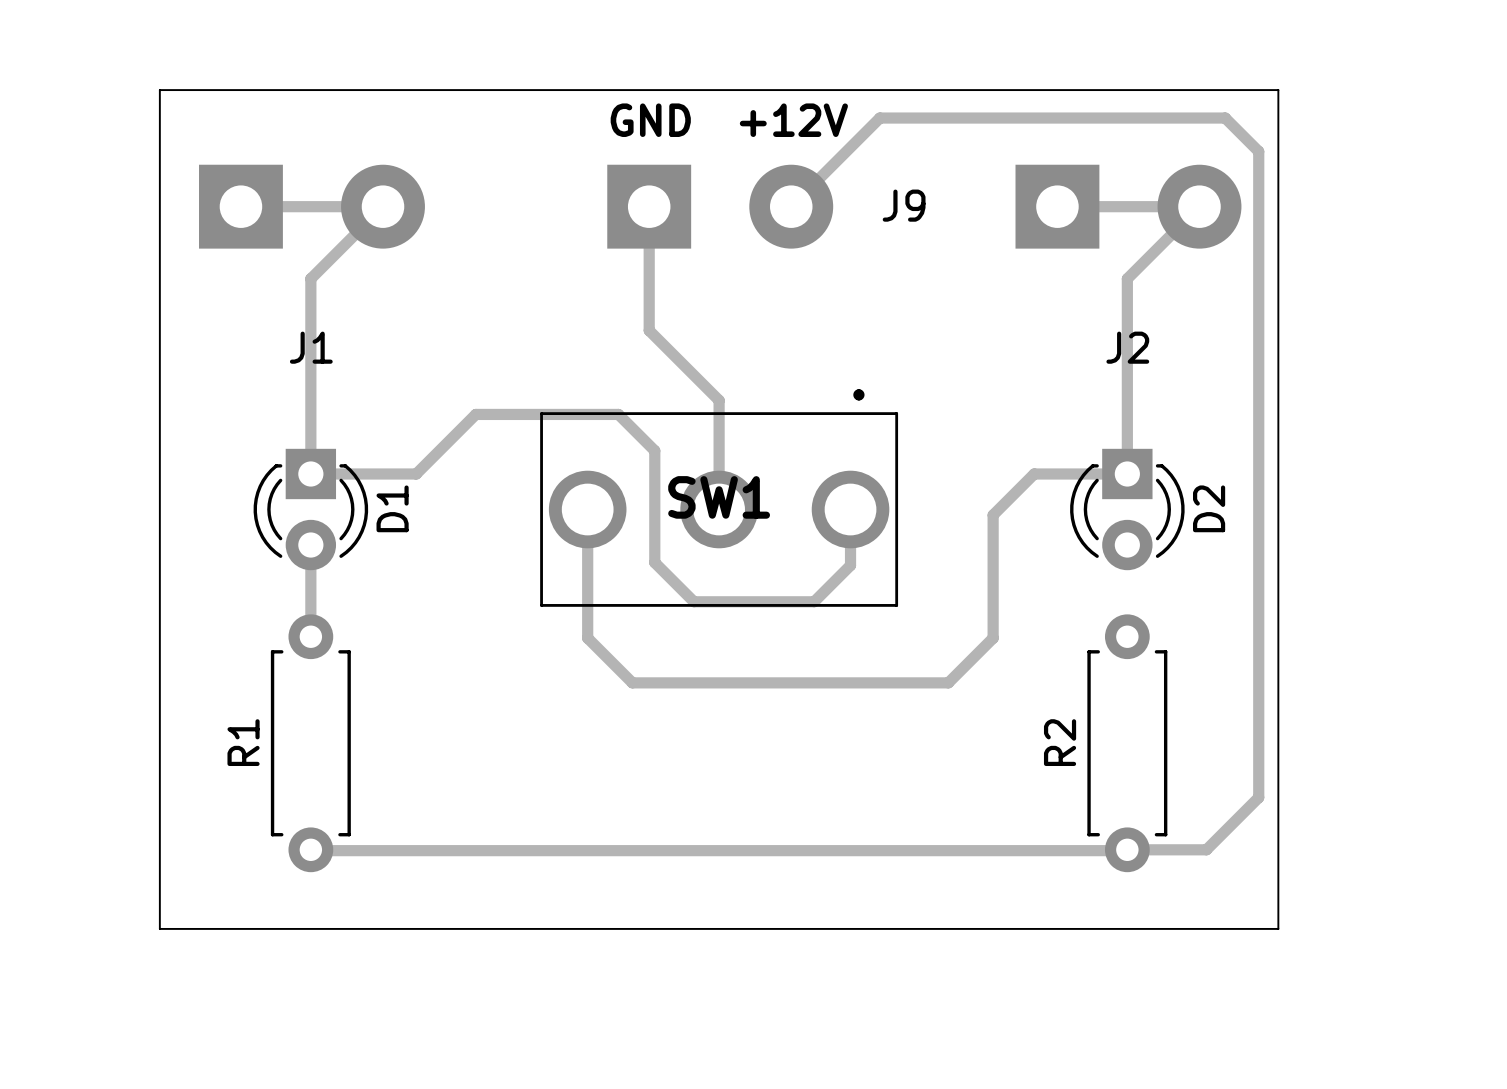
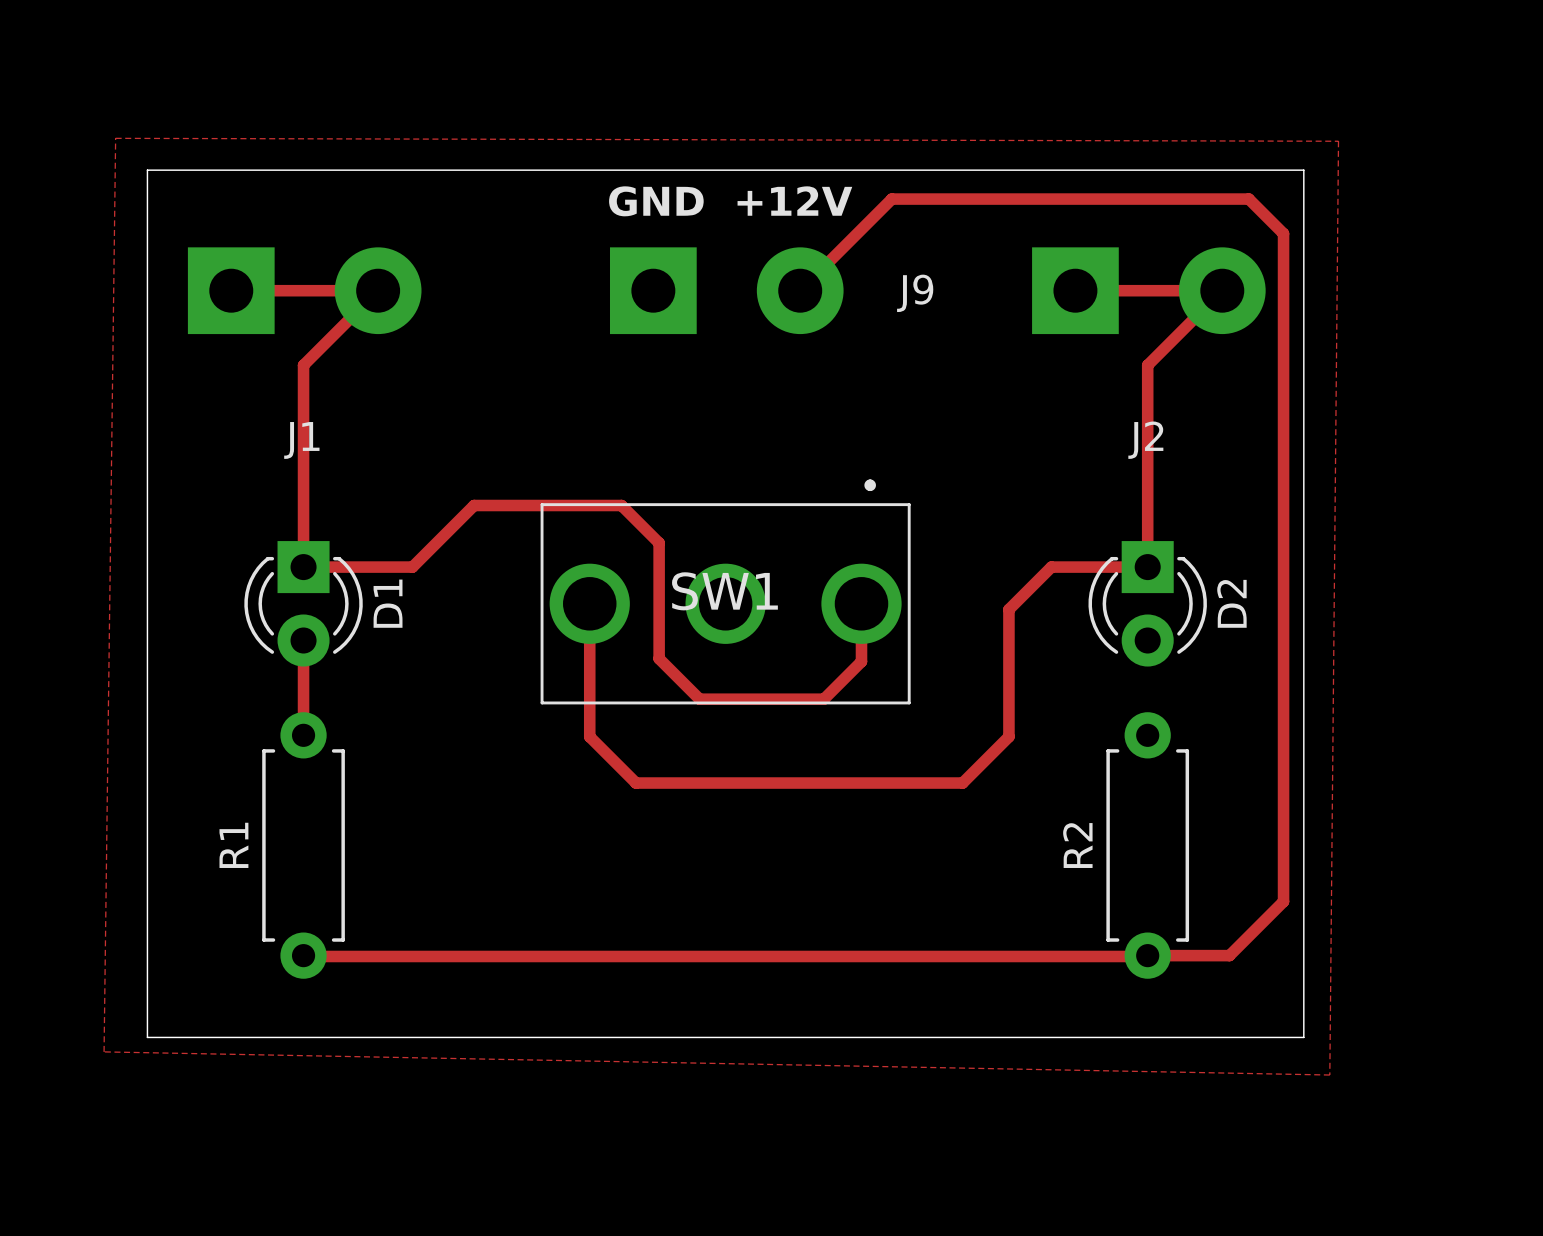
zone outline: none -> (115, 138) (1338, 141) (1329, 1075) (104, 1051) (115, 138)
track: (649, 206) (649, 330) (719, 400) (719, 509) -> none

